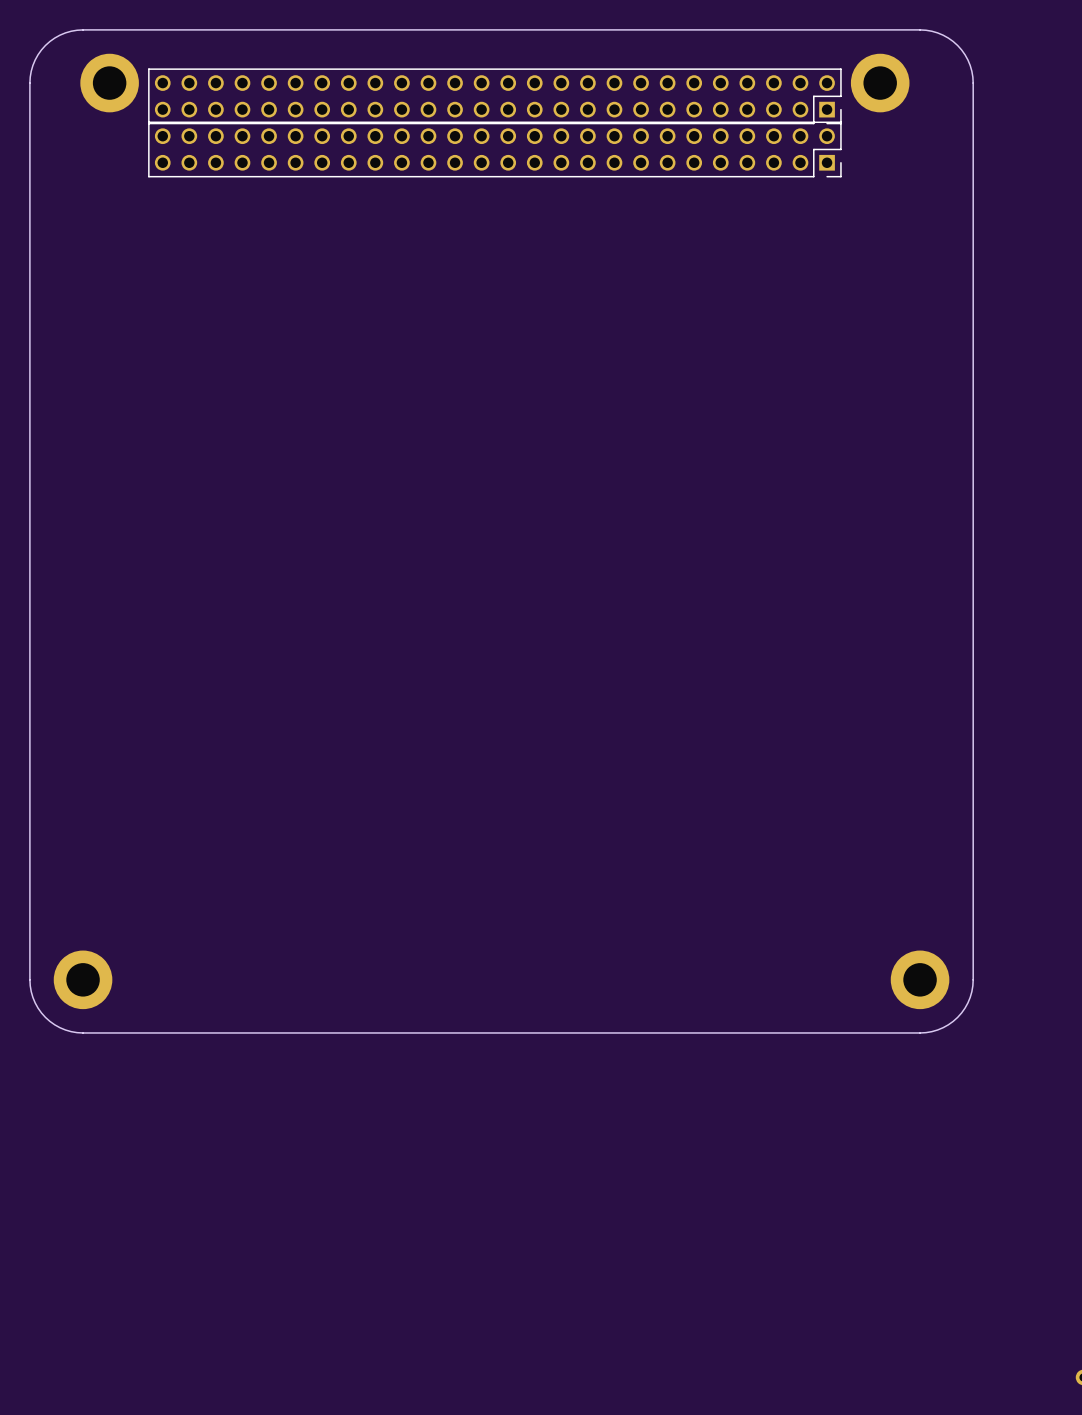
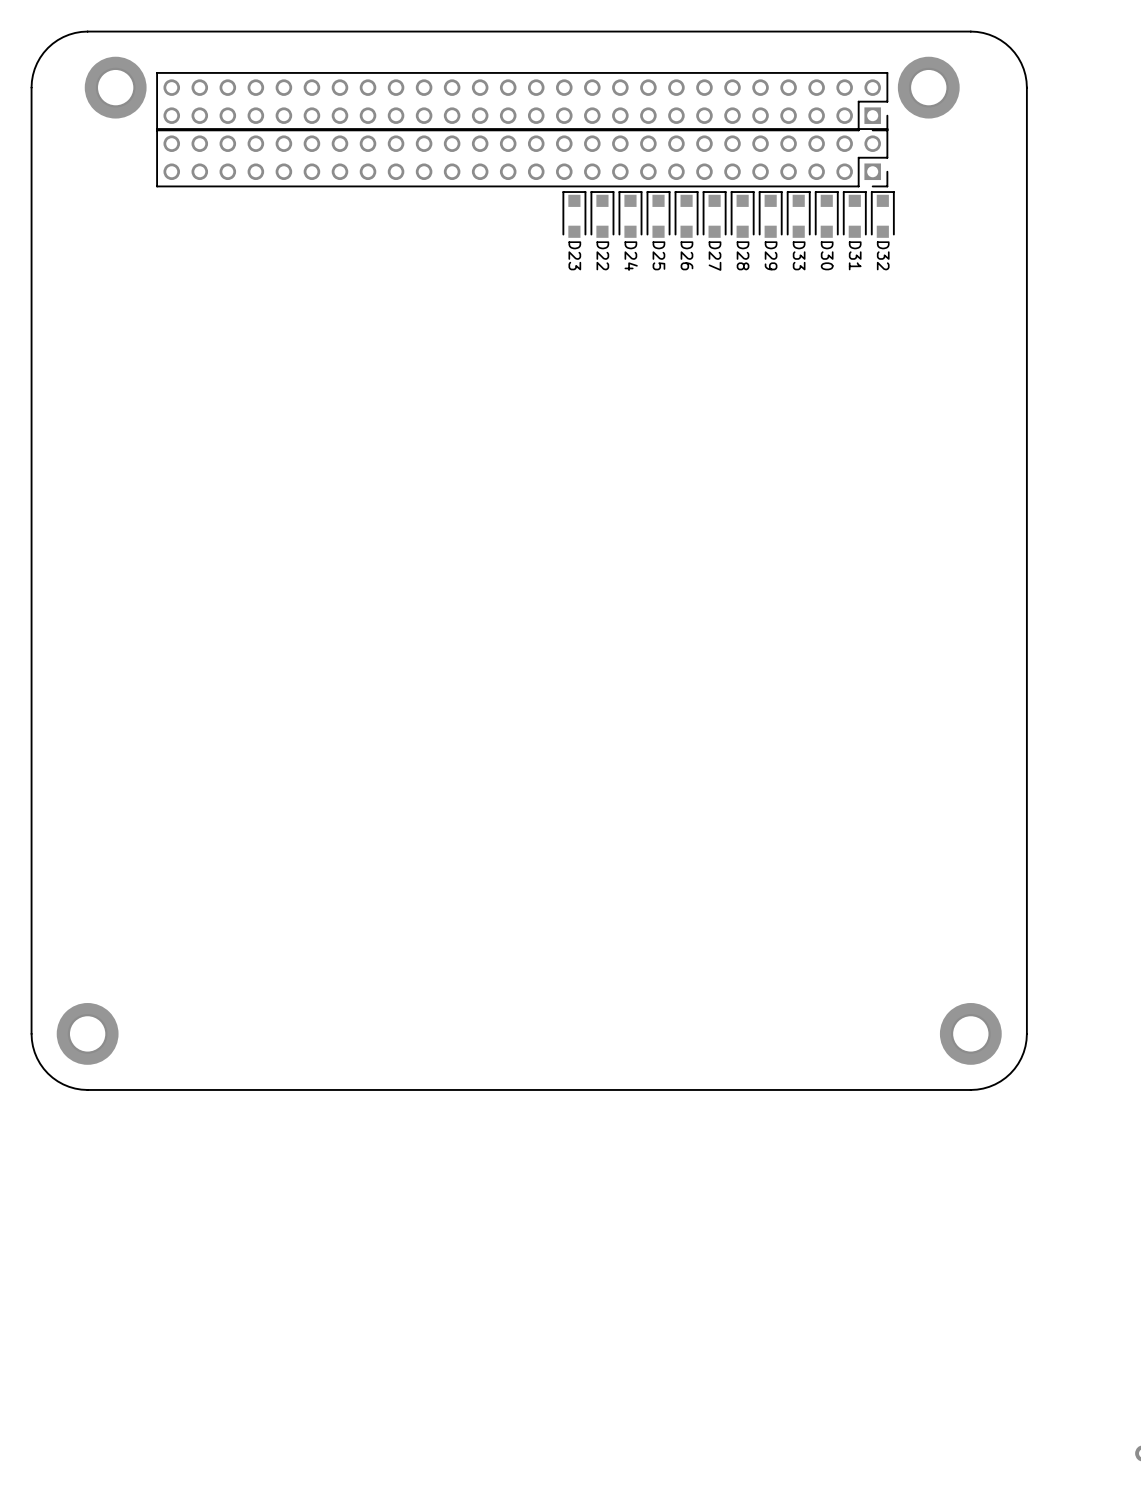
D23: none -> (574, 214)
D22: none -> (602, 214)
D24: none -> (630, 214)
D25: none -> (658, 214)
D26: none -> (686, 214)
D27: none -> (714, 214)
D28: none -> (742, 214)
D29: none -> (770, 214)
D33: none -> (798, 214)
D30: none -> (826, 214)
D31: none -> (854, 214)
D32: none -> (882, 214)

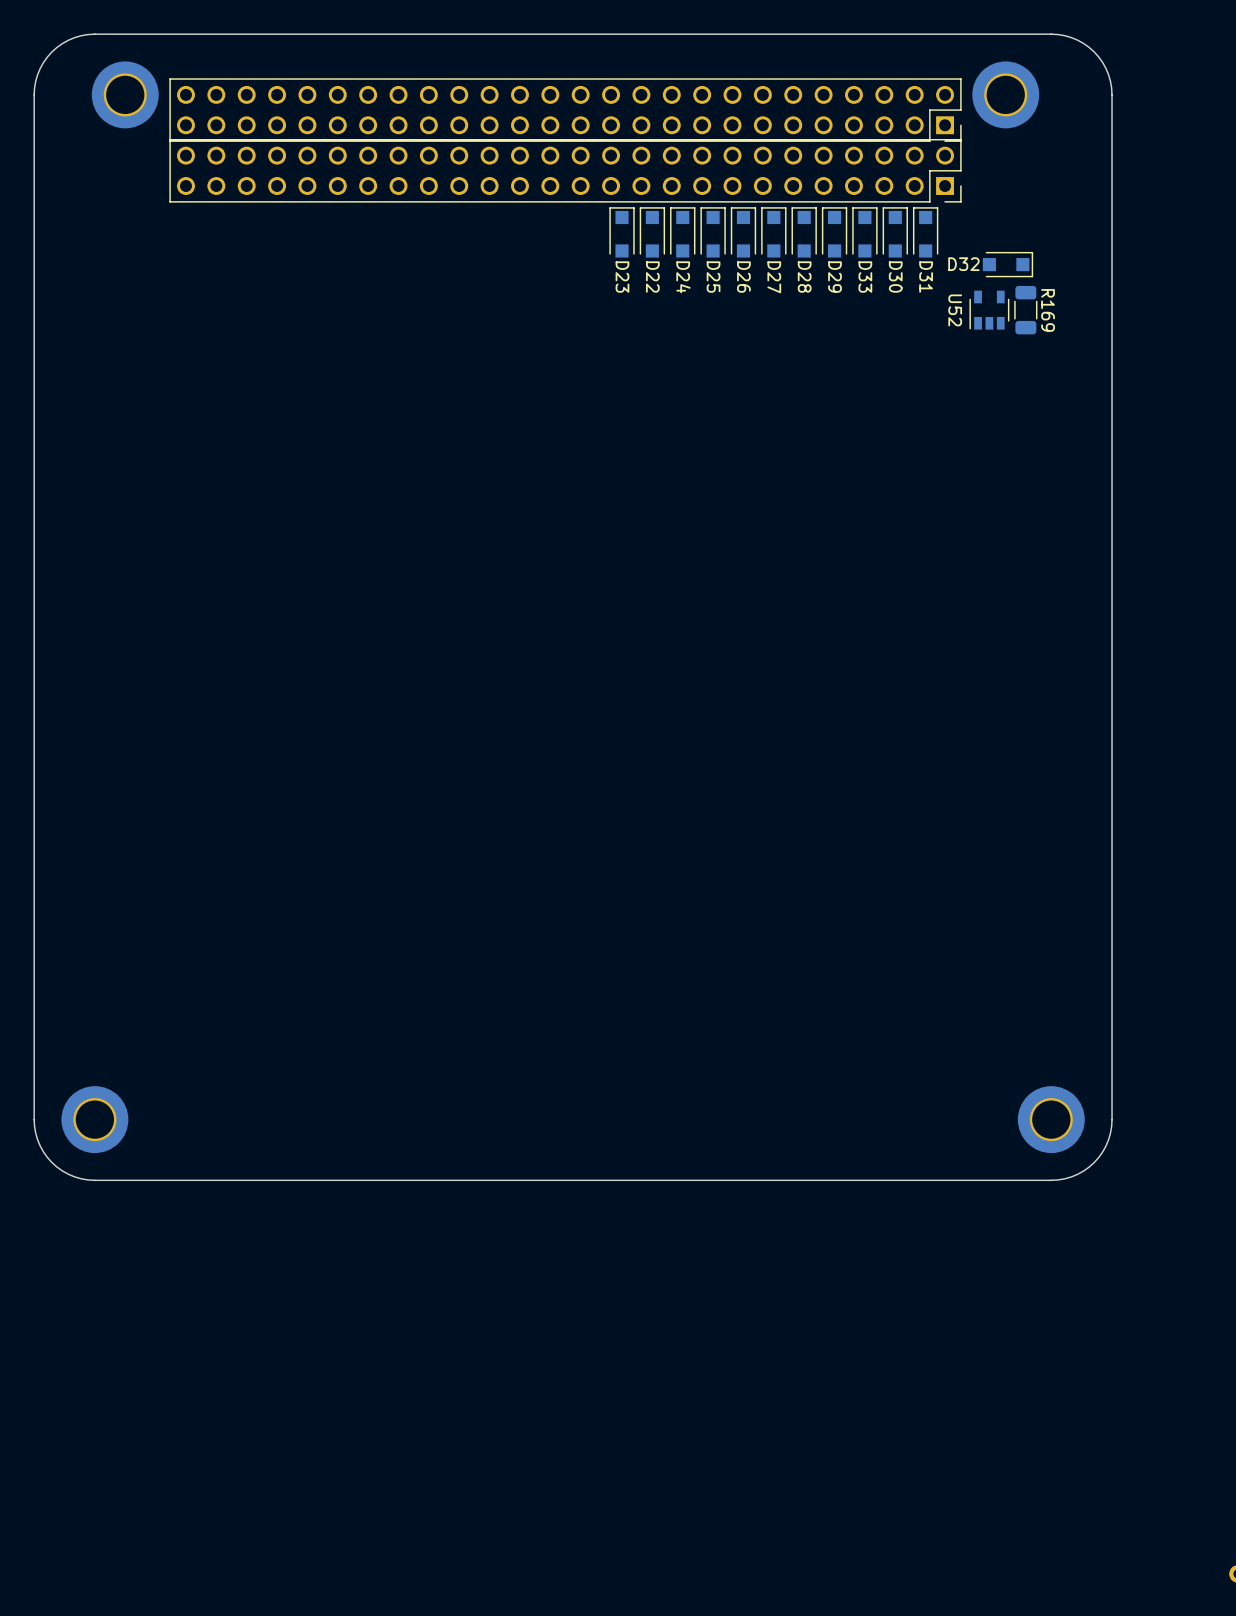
D32 rotation: 0° (882, 214) -> 90° clockwise (1007, 264)
D32 position: (882, 214) -> (1007, 264)
U52: none -> (989, 310)
R169: none -> (1025, 310)

